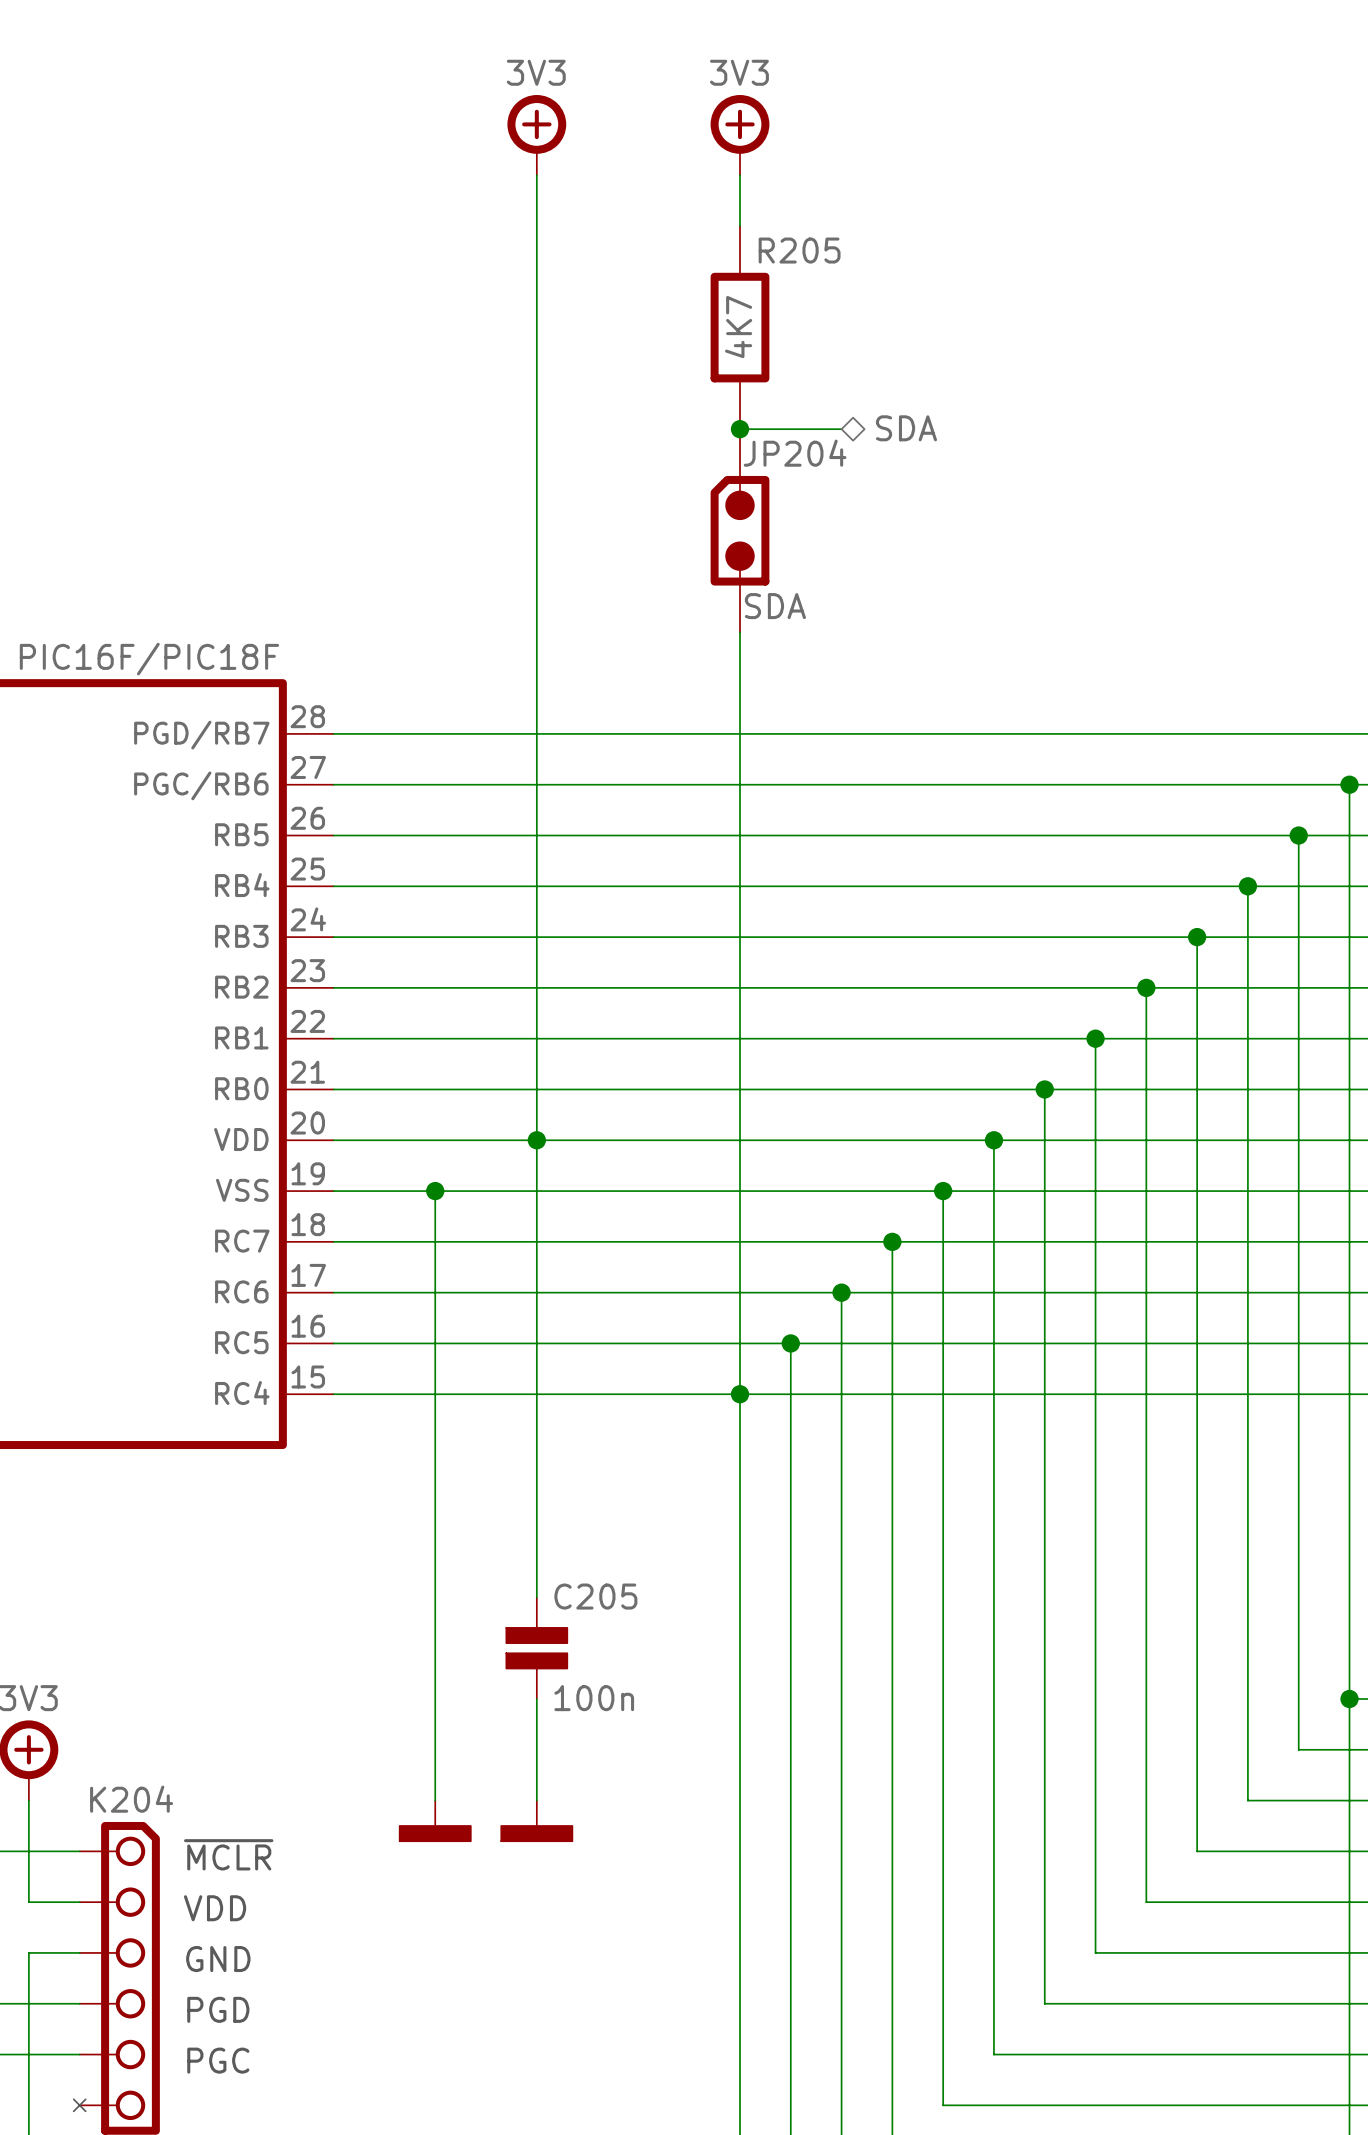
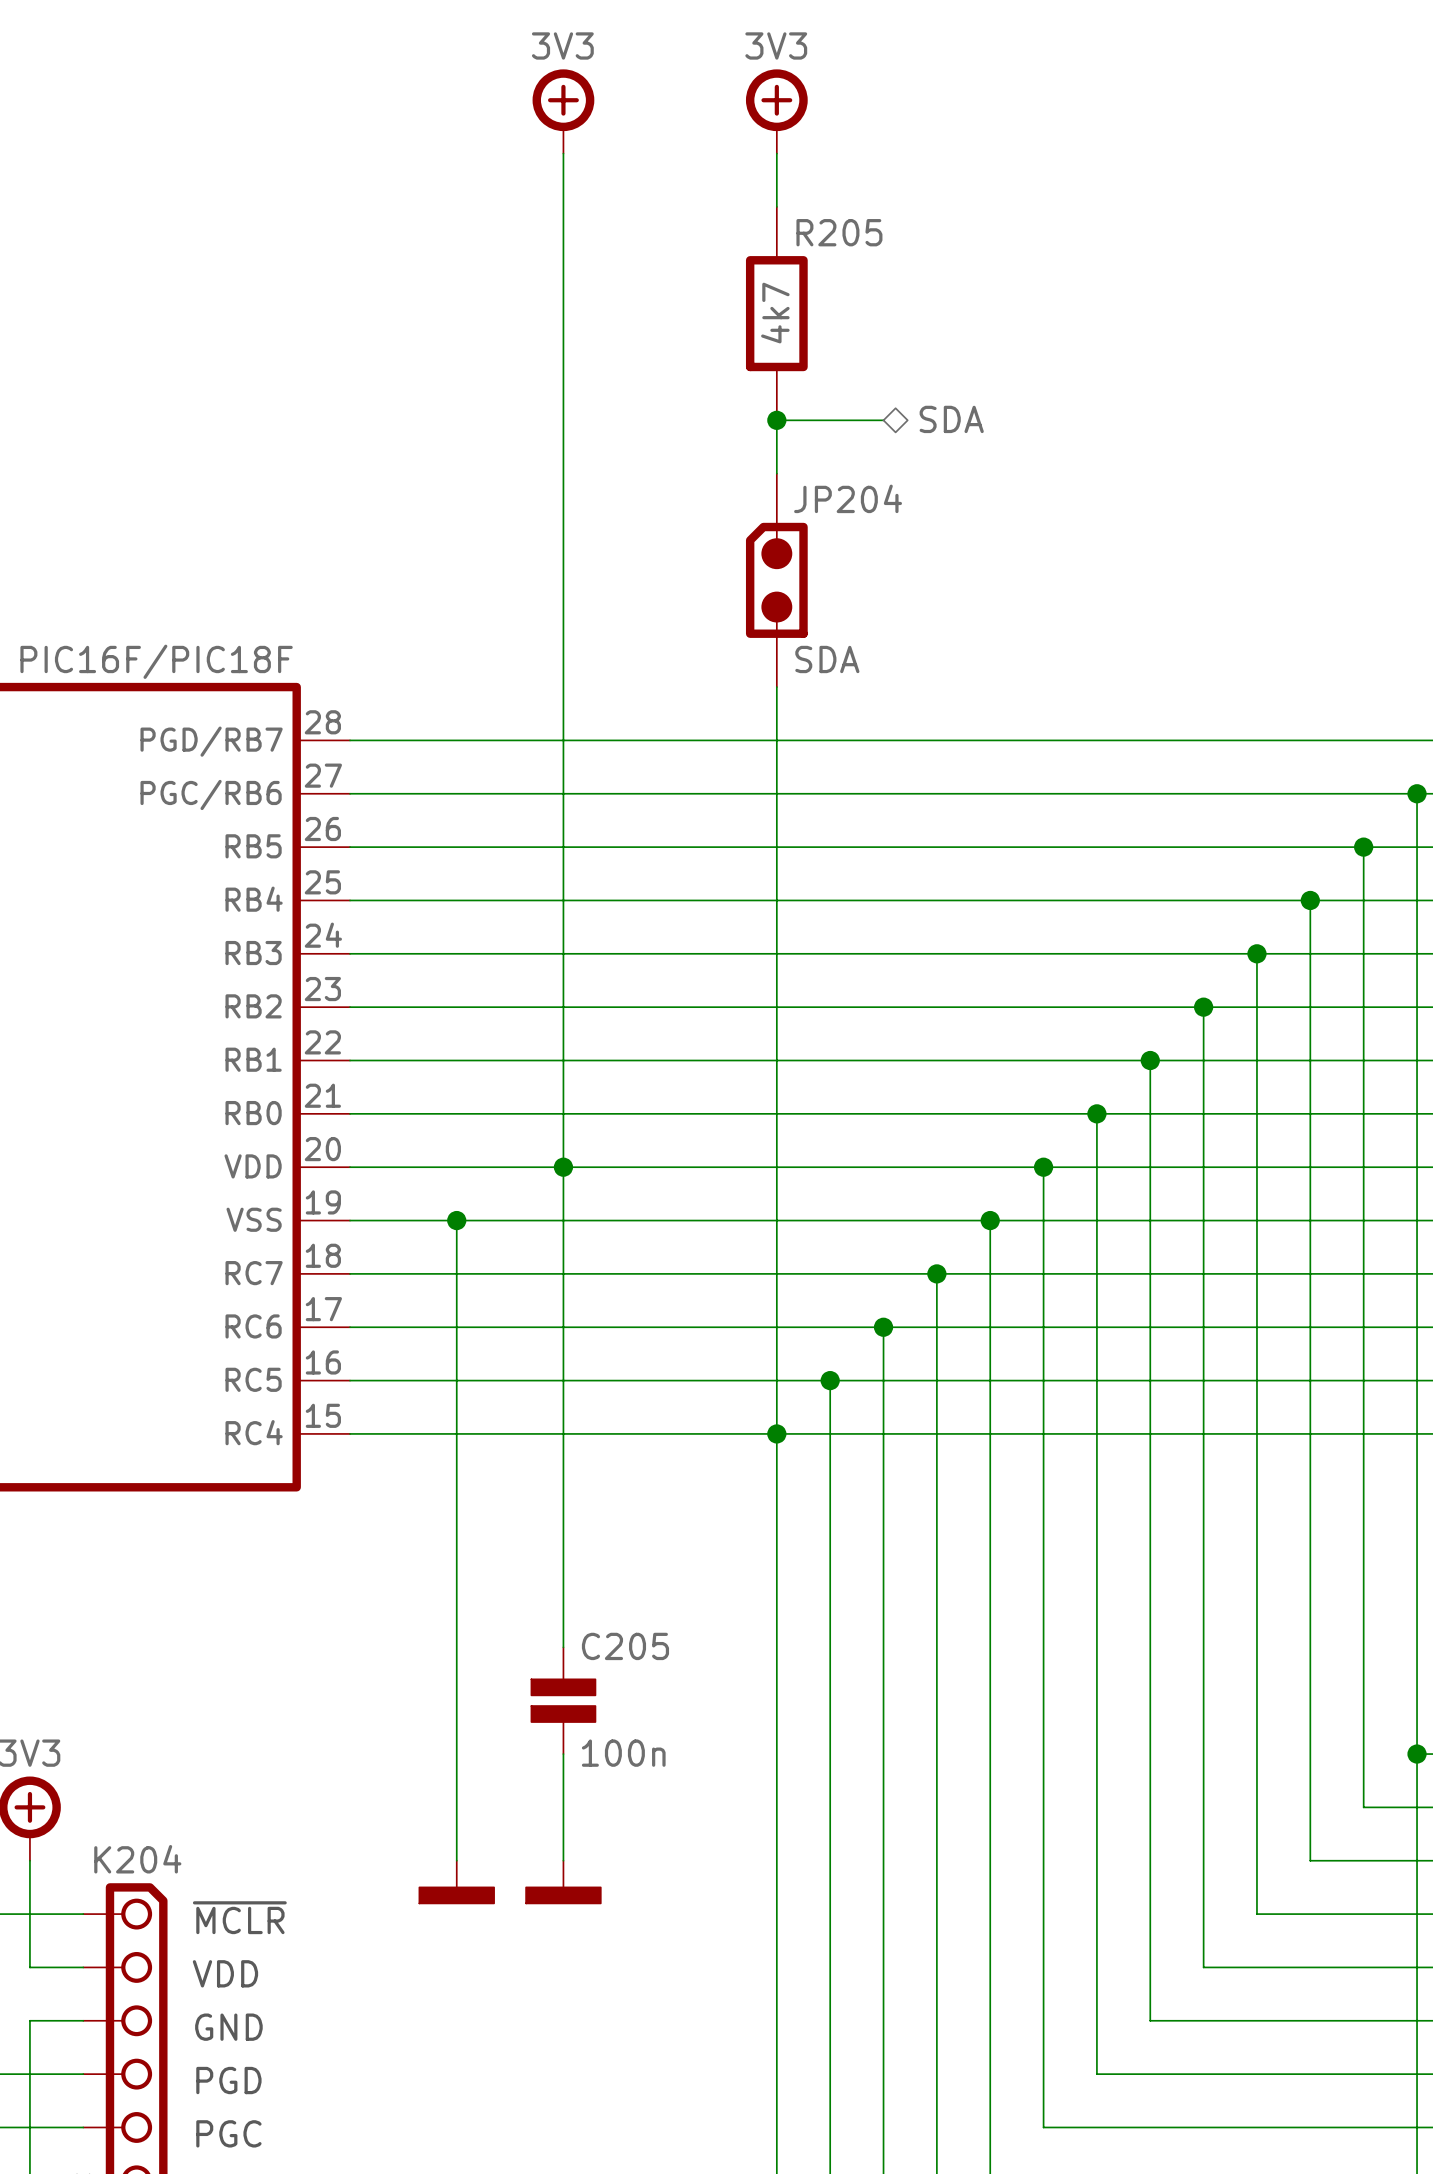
R205 value: 4K7 (738, 327) -> 4k7 (775, 313)
JP204 name position: JP204 (795, 453) -> JP204 (848, 498)
JP204 position: (740, 530) -> (776, 580)
JP204 value position: SDA (775, 606) -> SDA (827, 659)

